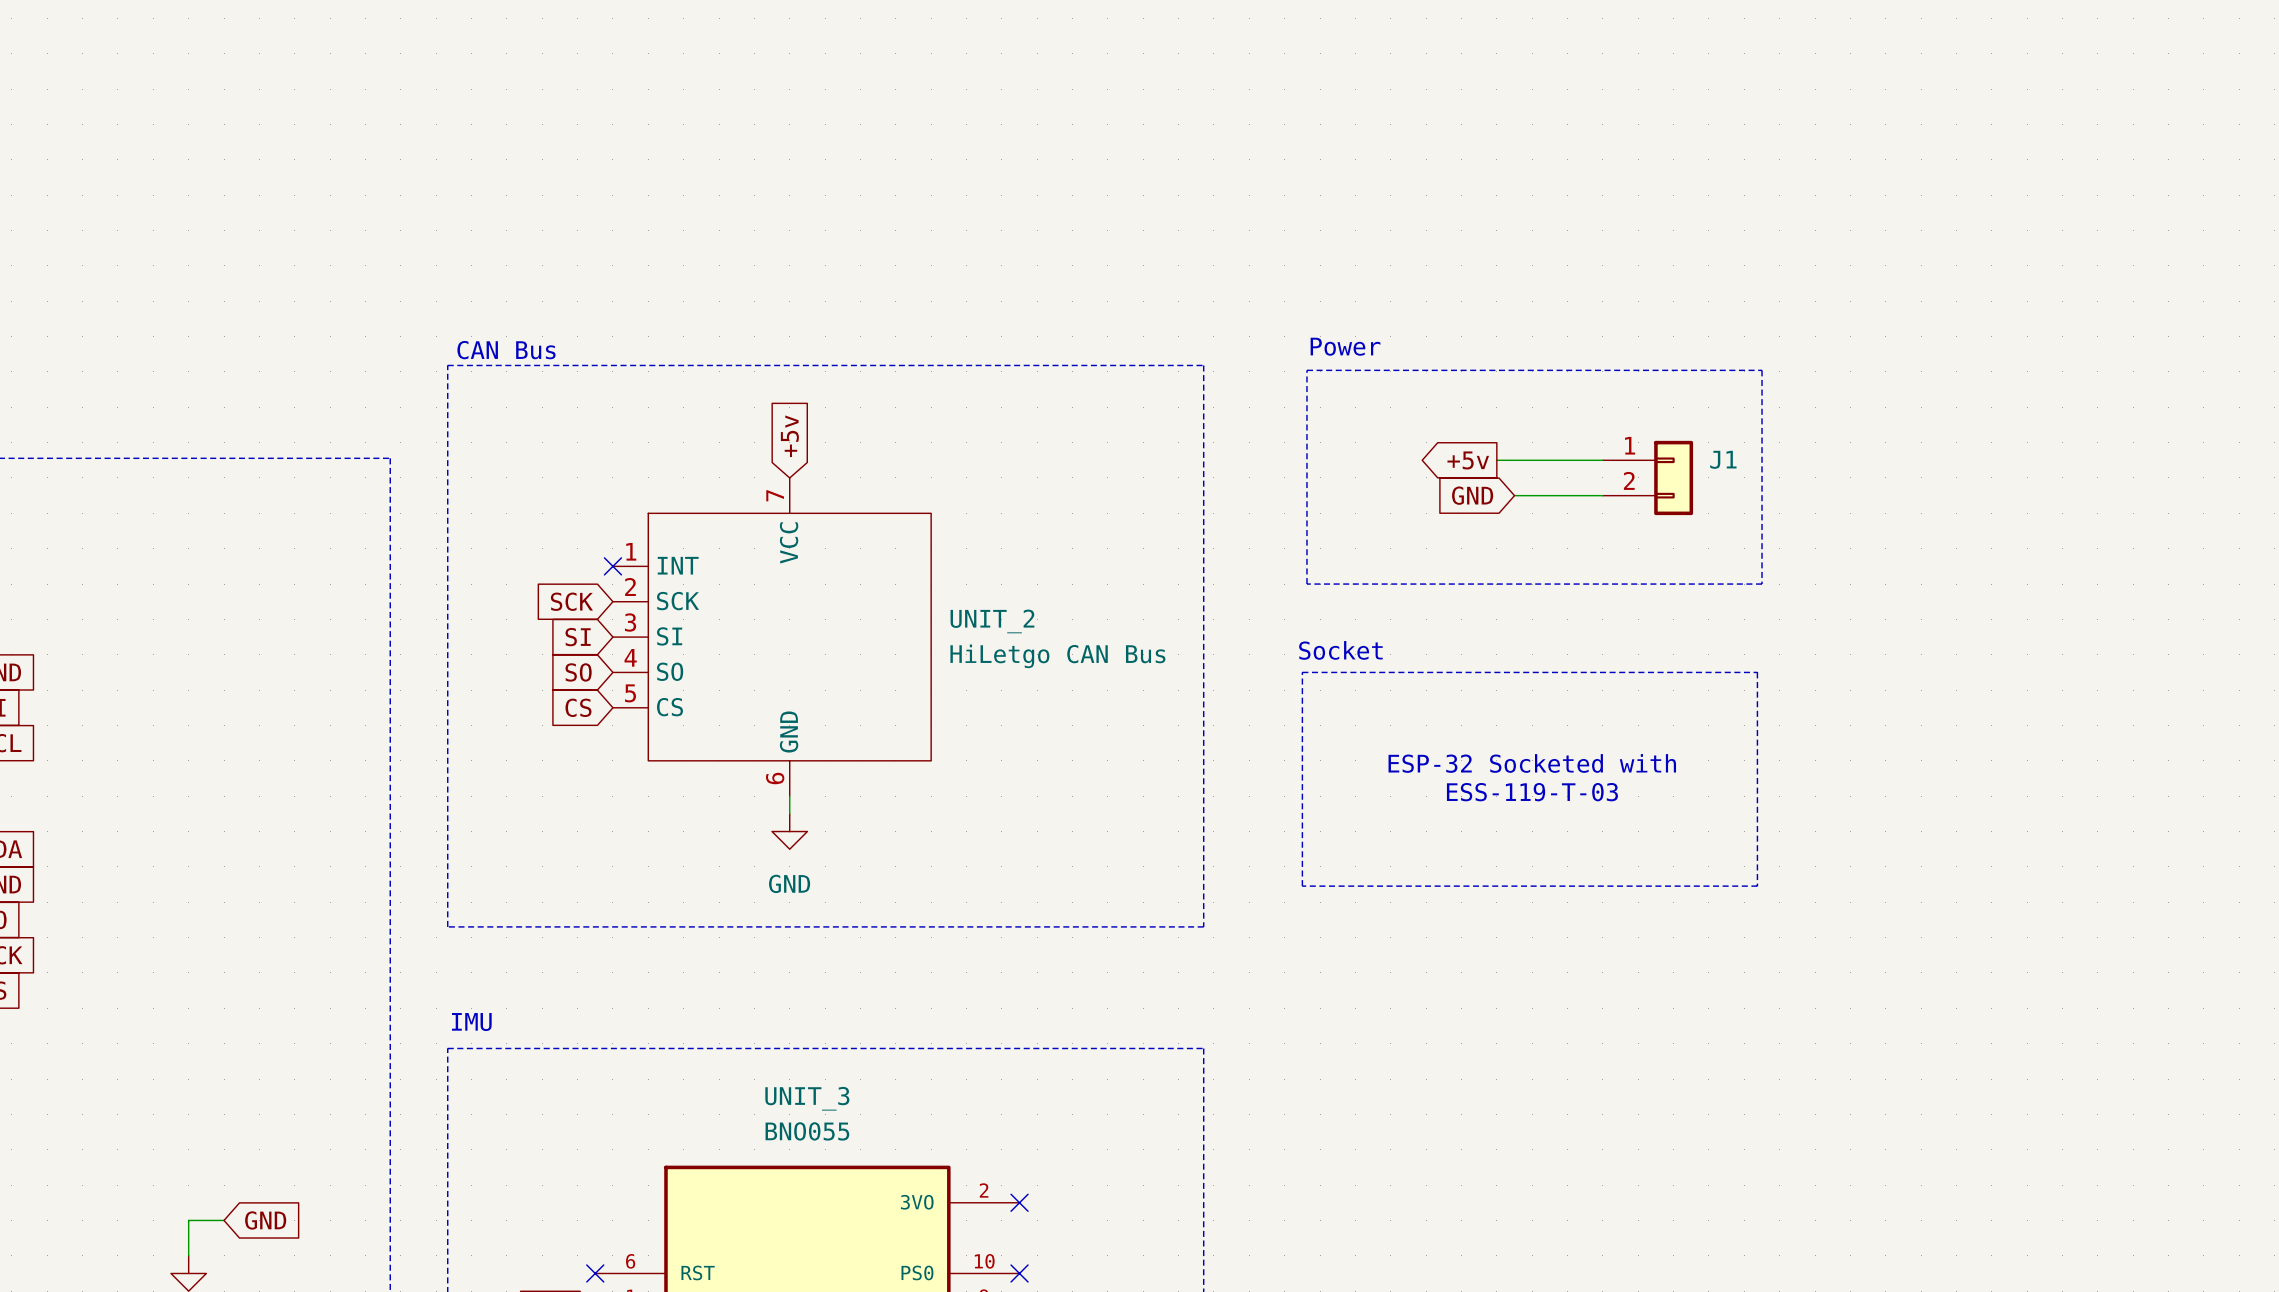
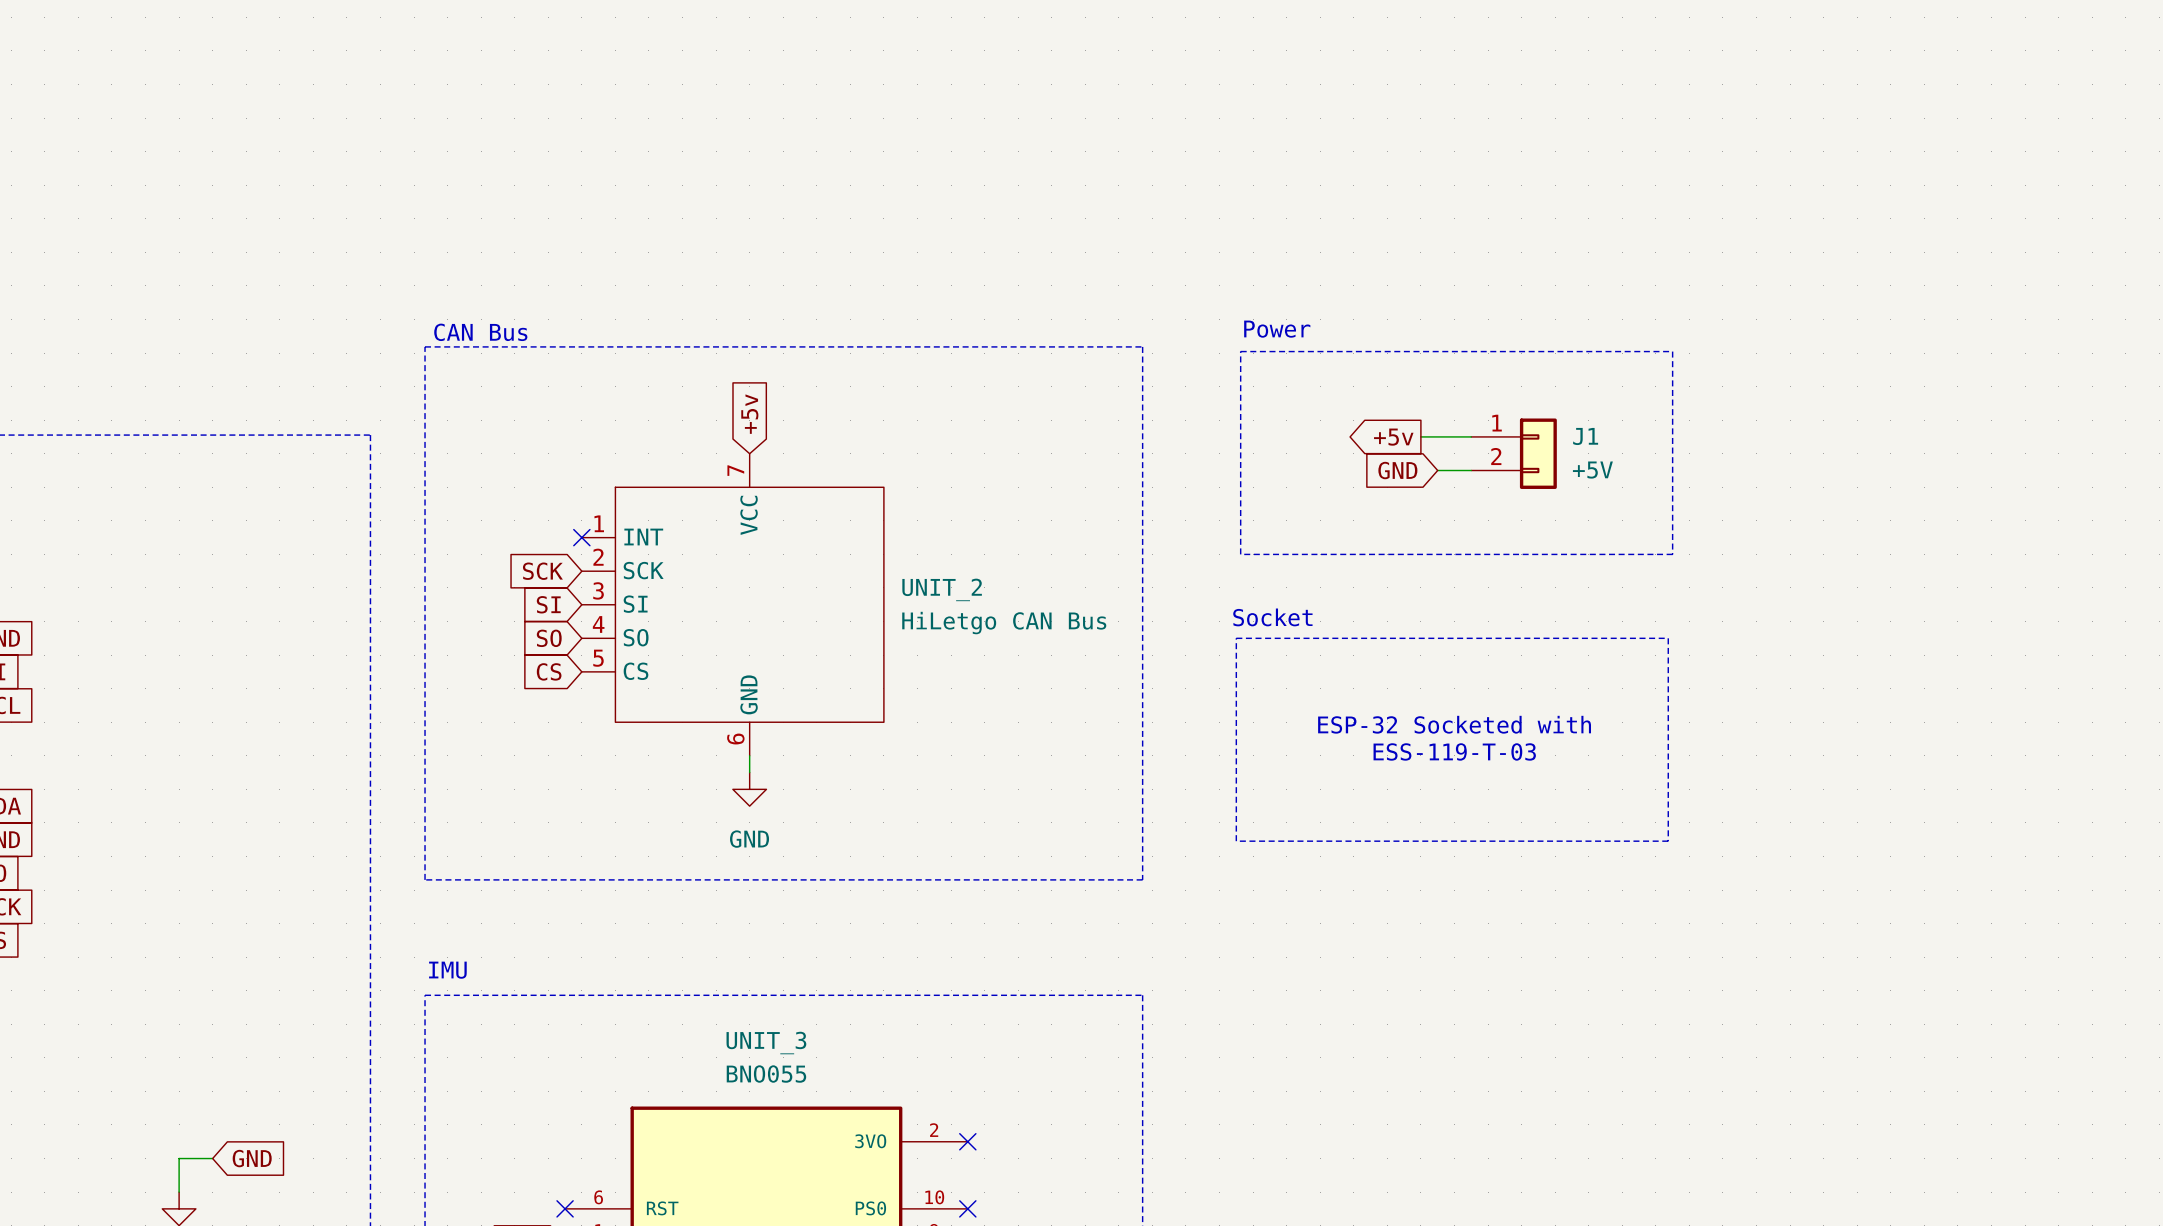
J1 position: (1647, 477) -> (1514, 453)
J1 value: none -> +5V (1592, 470)

